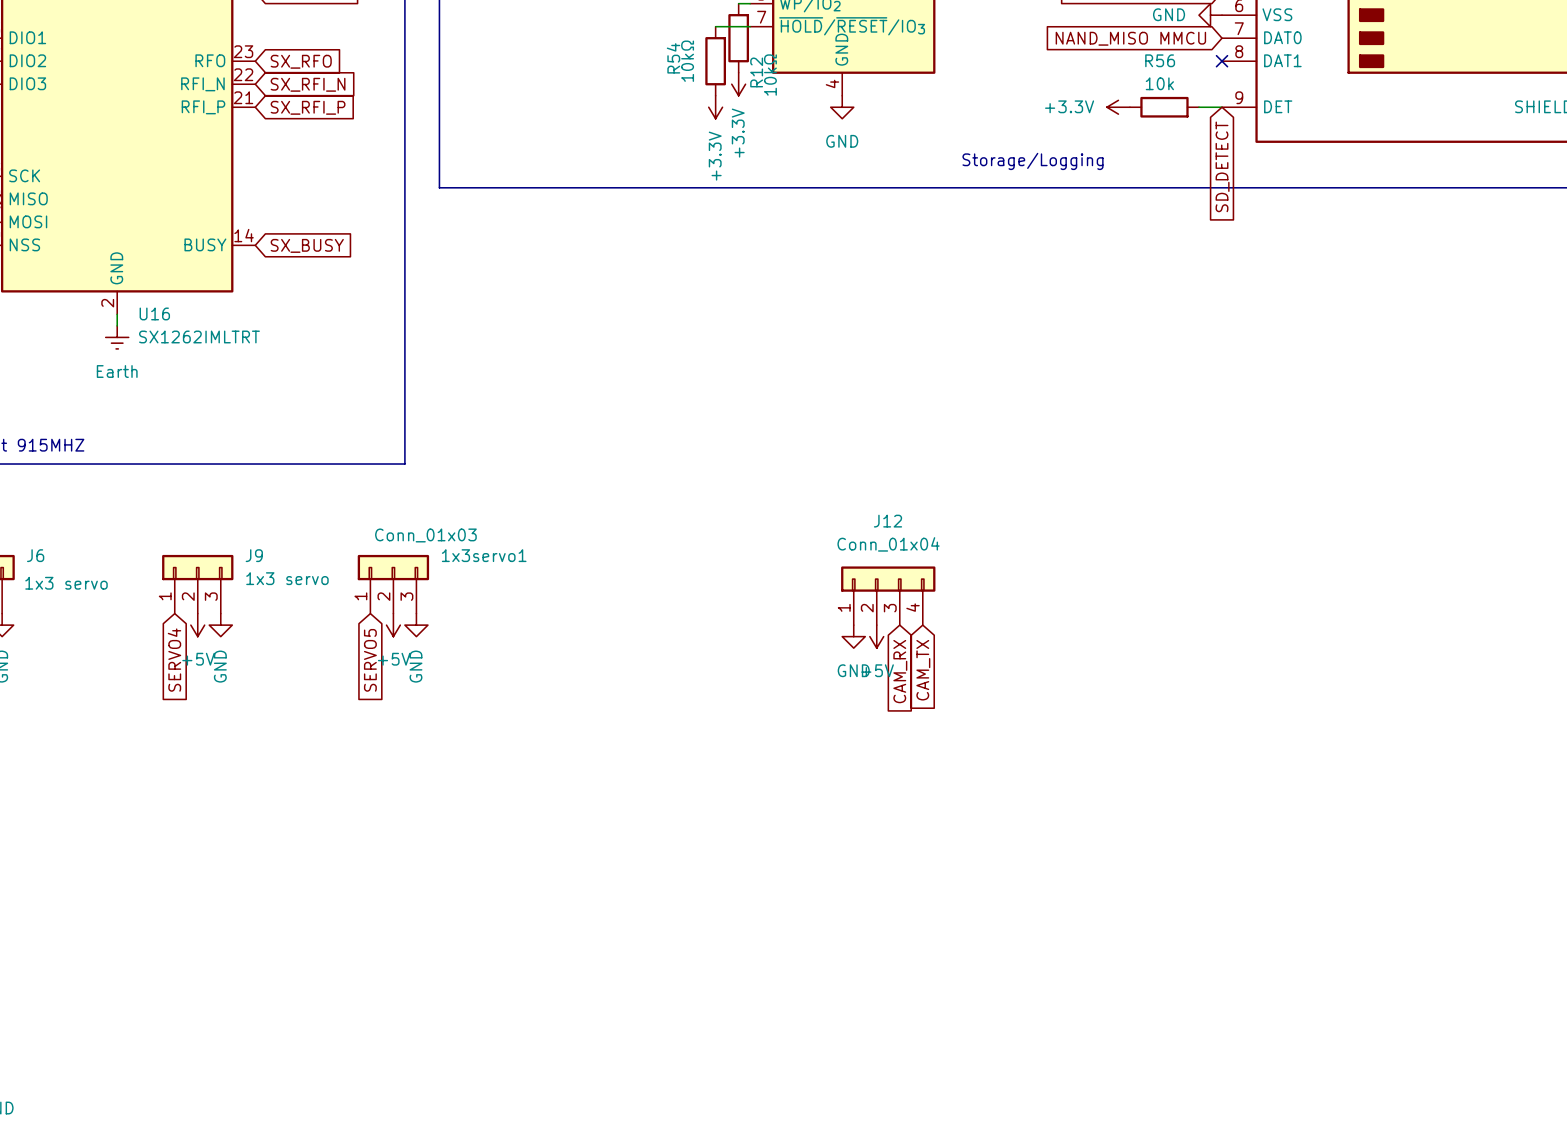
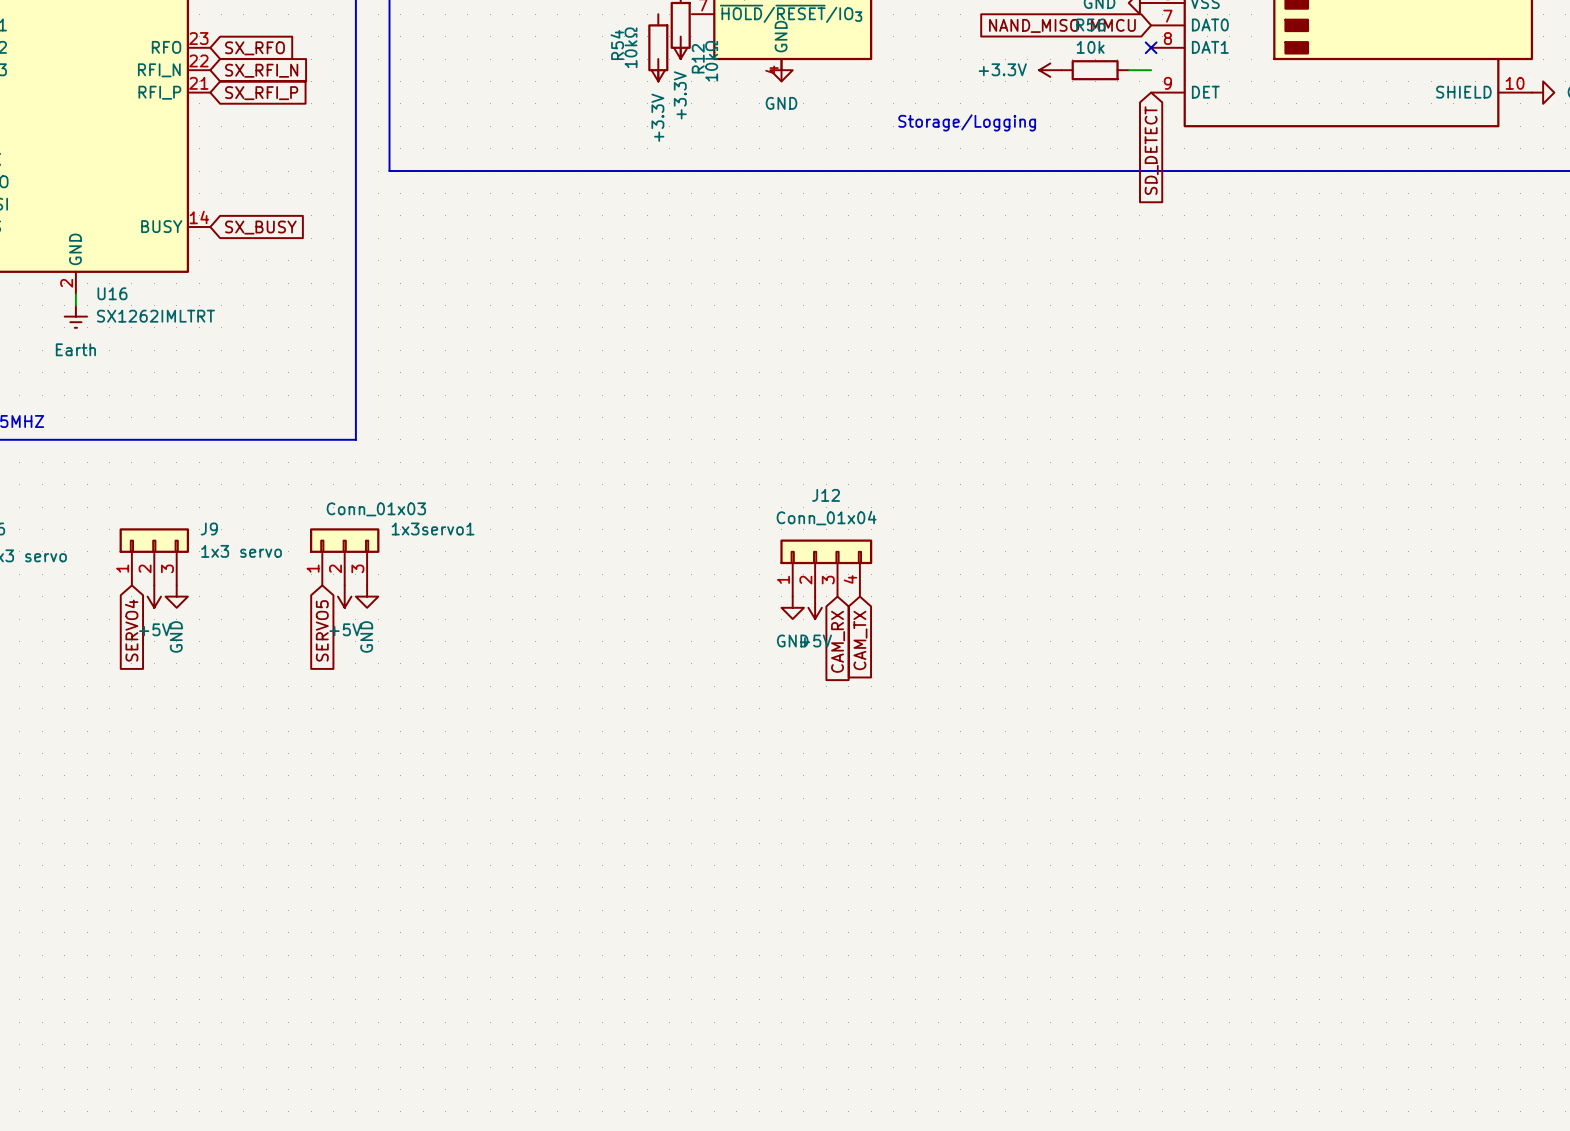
wire: (715, 26) (750, 26) -> none
power symbol: none -> +3.3V (680, 47)
power symbol: none -> +3.3V (658, 70)
power symbol: +3.3V (738, 84) -> none
power symbol: +3.3V (715, 107) -> none
power symbol position: GND (842, 107) -> GND (781, 70)
power symbol position: +3.3V (1118, 107) -> +3.3V (1050, 70)
R56 position: (1164, 107) -> (1095, 70)
wire: (1198, 107) (1222, 107) -> (1128, 70) (1151, 70)
text position: Storage/Logging (1033, 161) -> Storage/Logging (967, 122)

